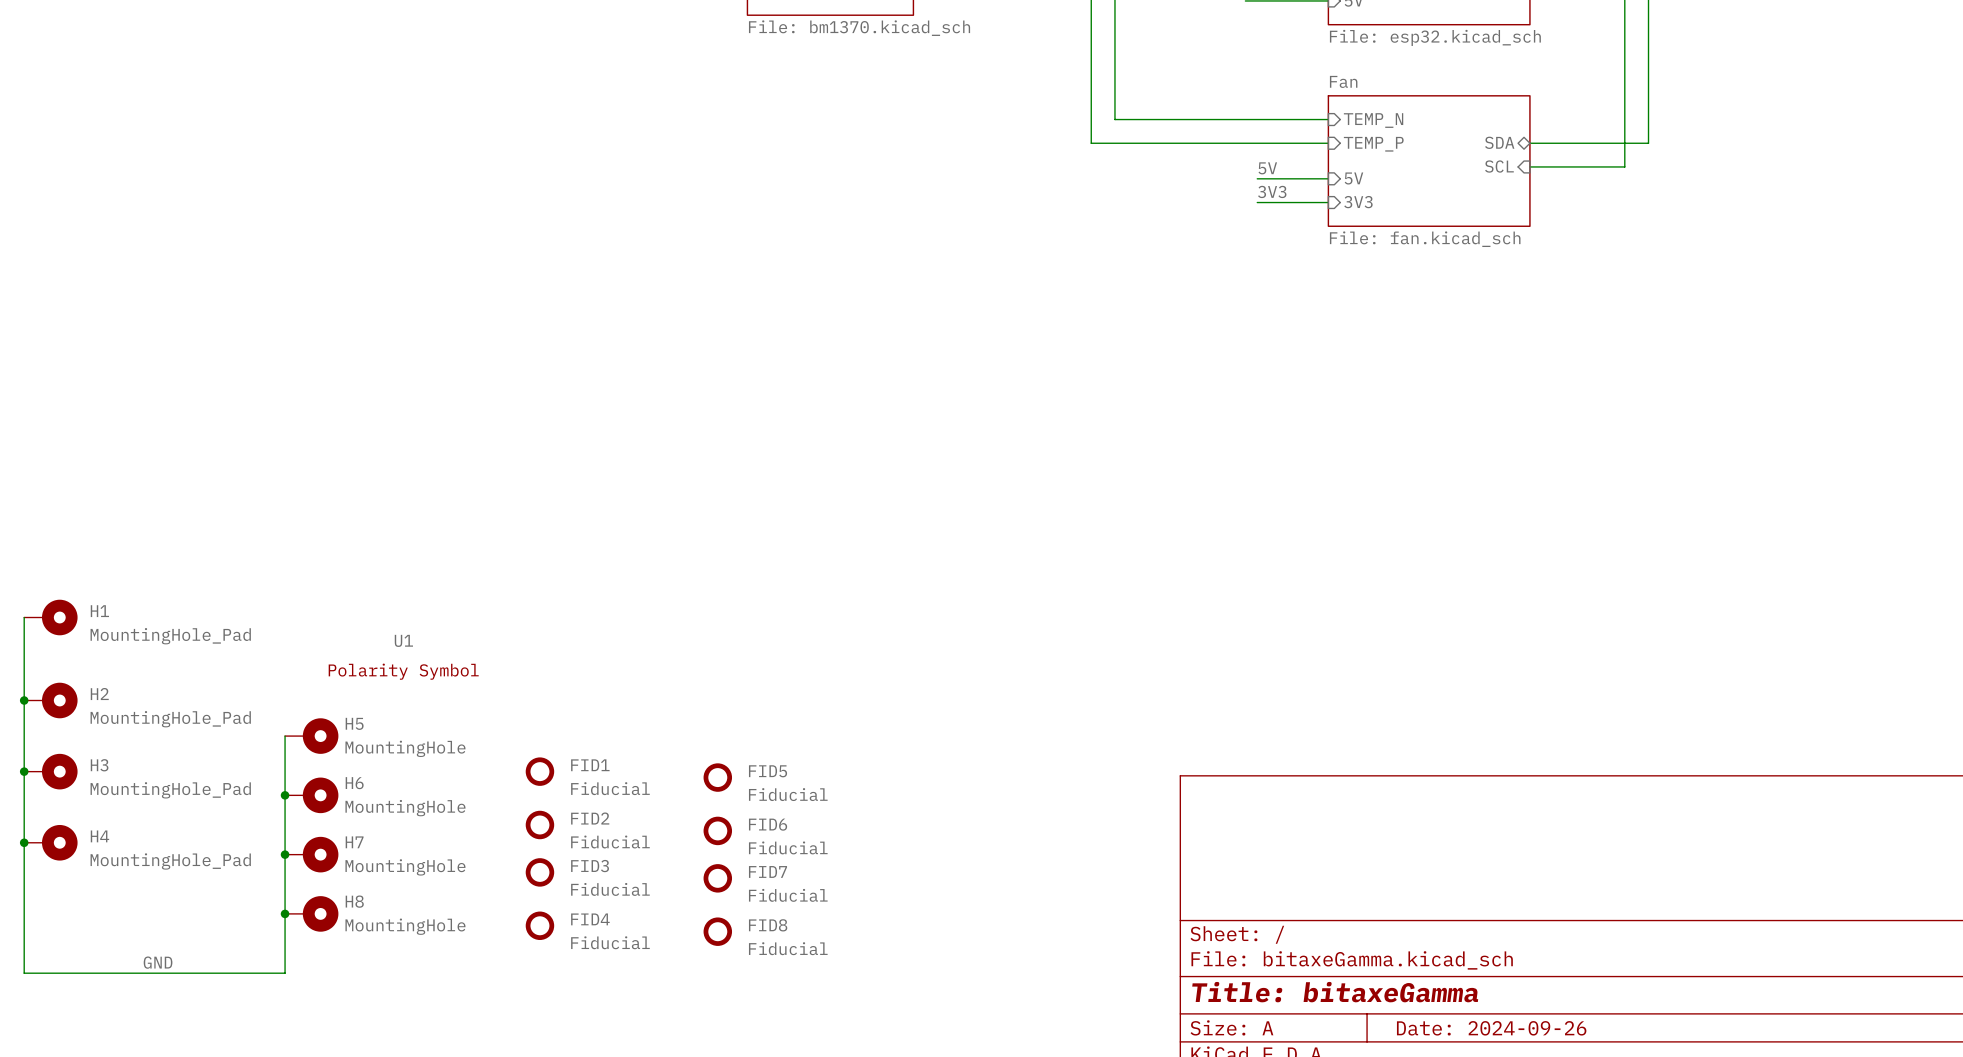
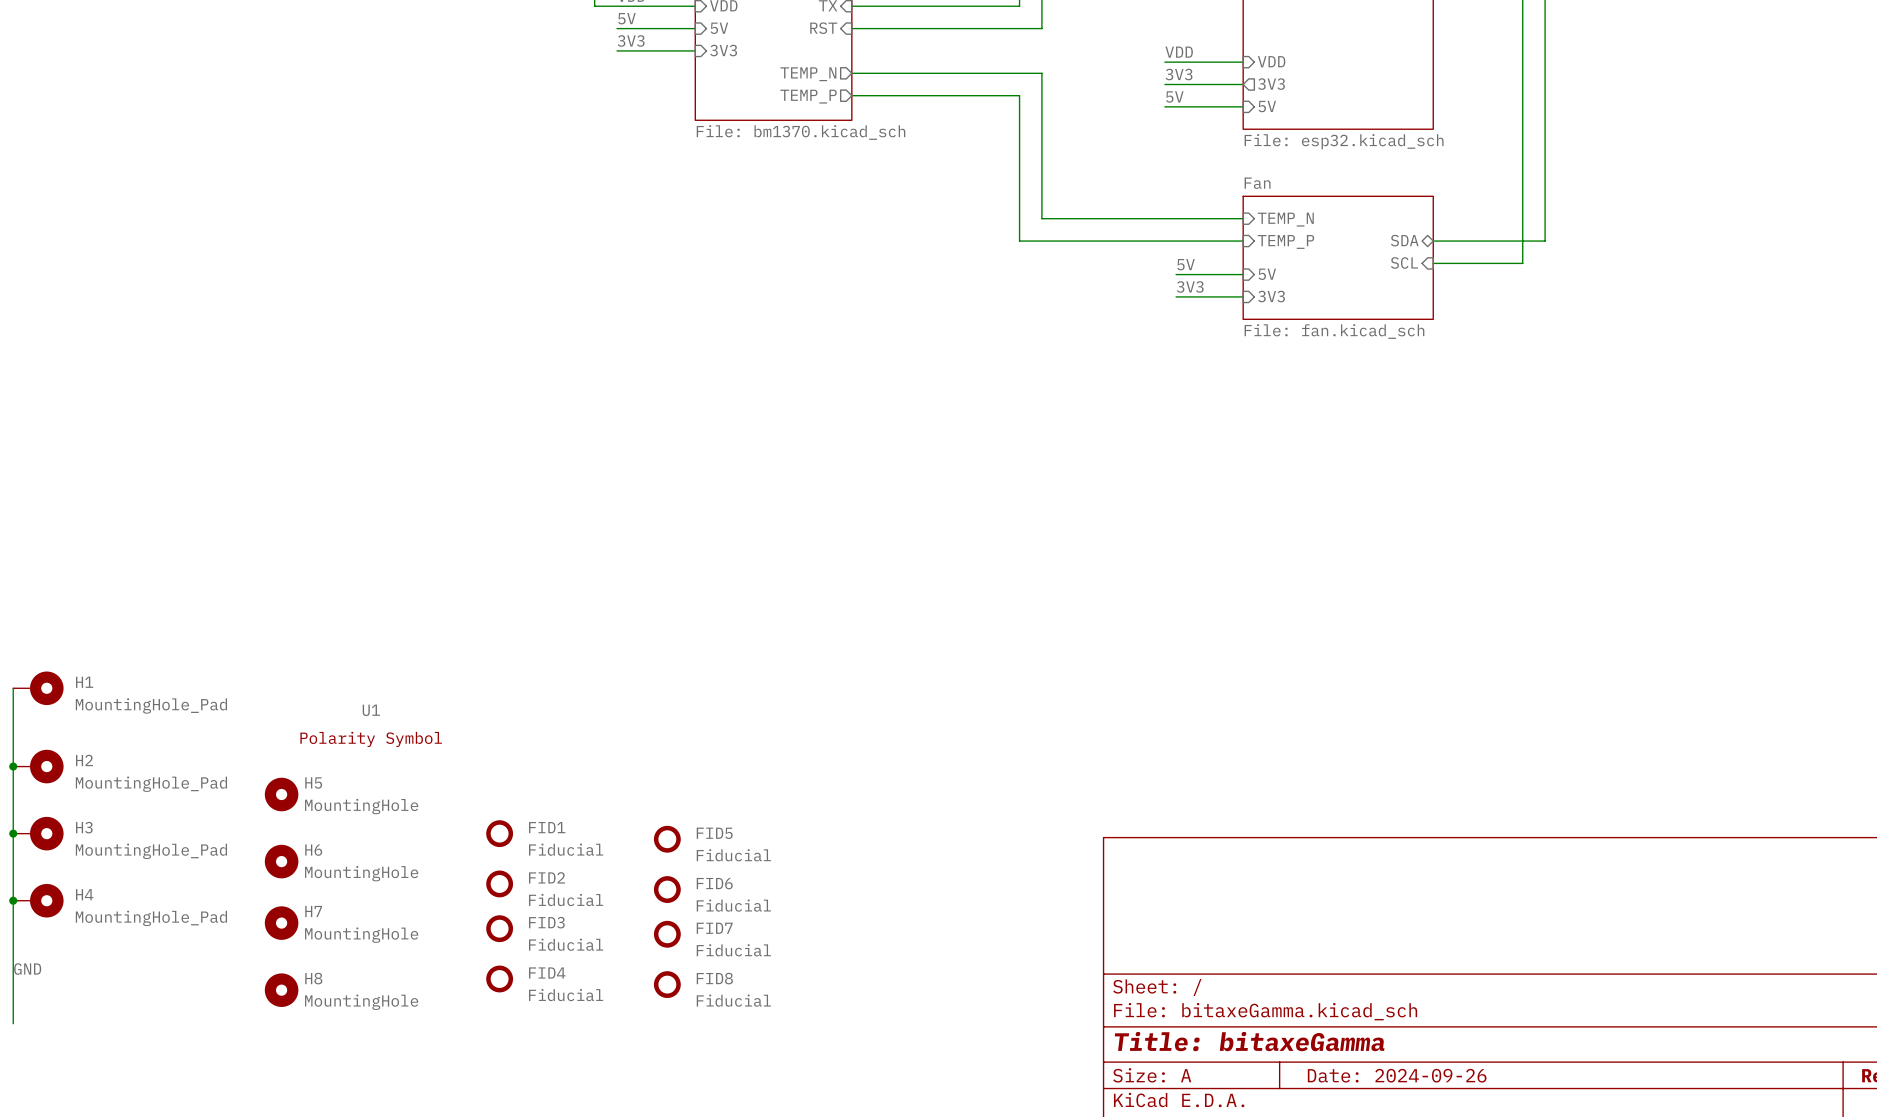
H5 symbol: [285, 718, 339, 754] -> [264, 777, 299, 812]
wire: (285, 736) (285, 973) (24, 973) -> none
H6 symbol: [285, 777, 339, 814] -> [264, 844, 299, 879]
junction: (285, 795) -> none
H7 symbol: [285, 836, 339, 873] -> [264, 906, 299, 940]
junction: (285, 854) -> none
H8 symbol: [285, 896, 339, 932] -> [264, 973, 299, 1007]
junction: (285, 913) -> none
label position: GND (158, 962) -> GND (27, 969)

